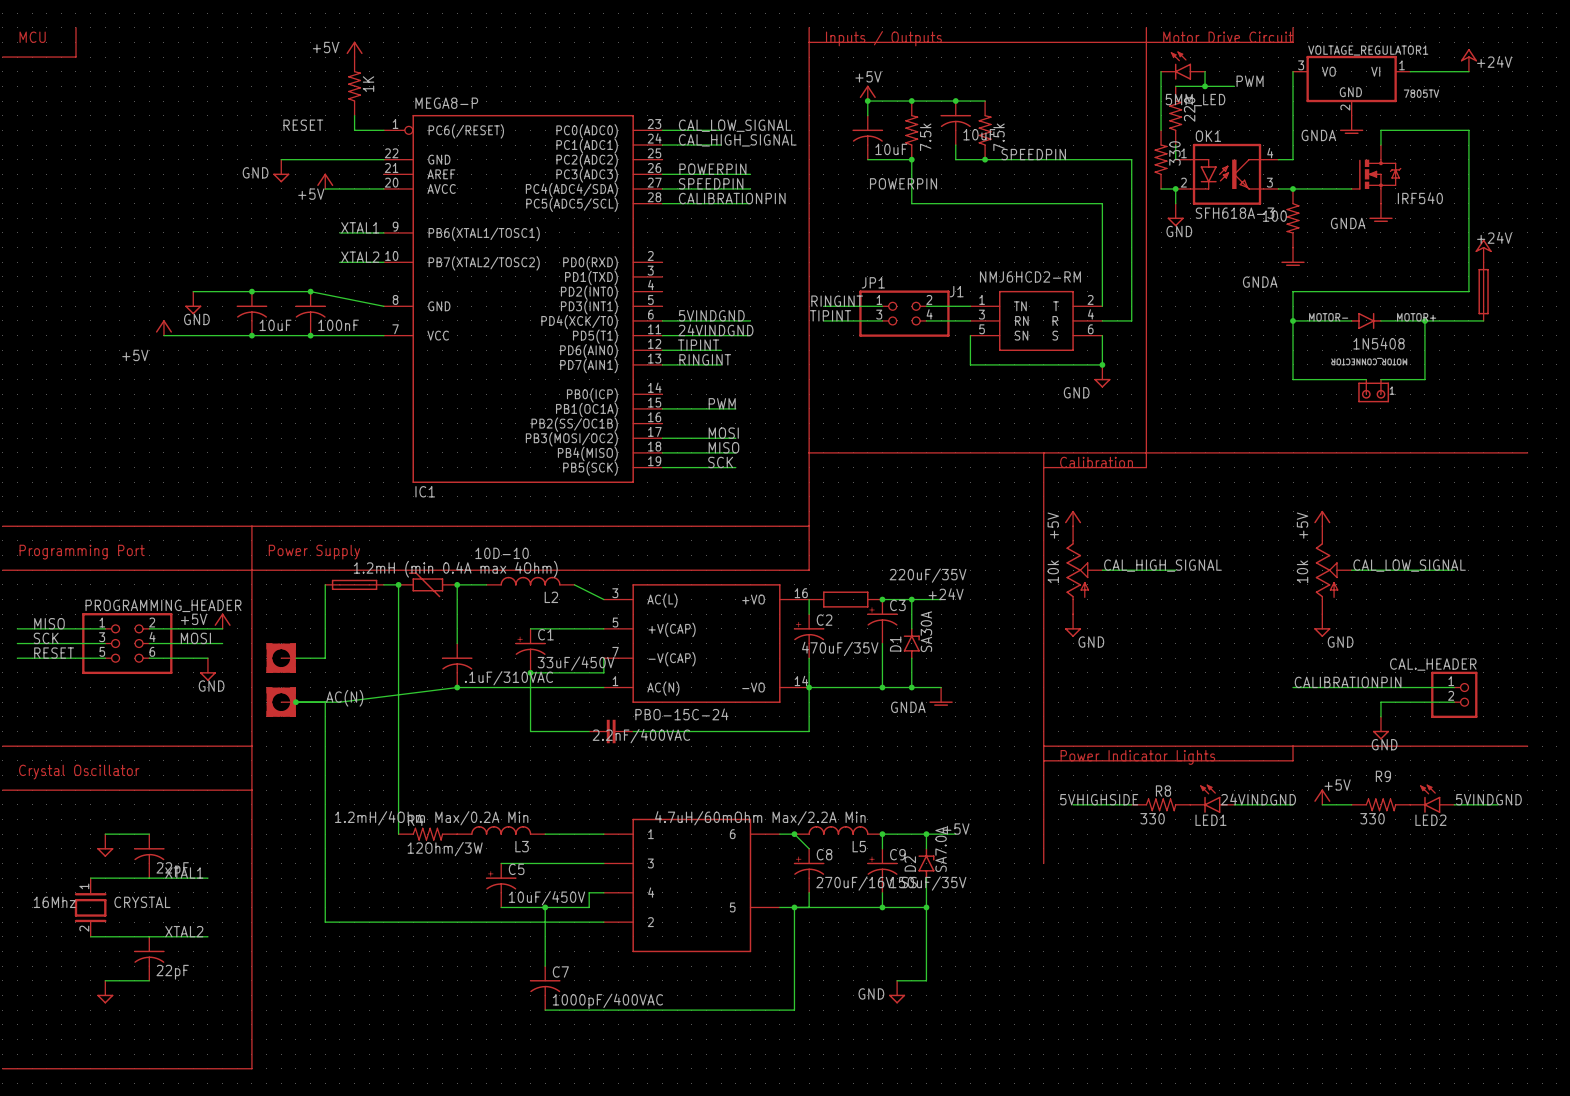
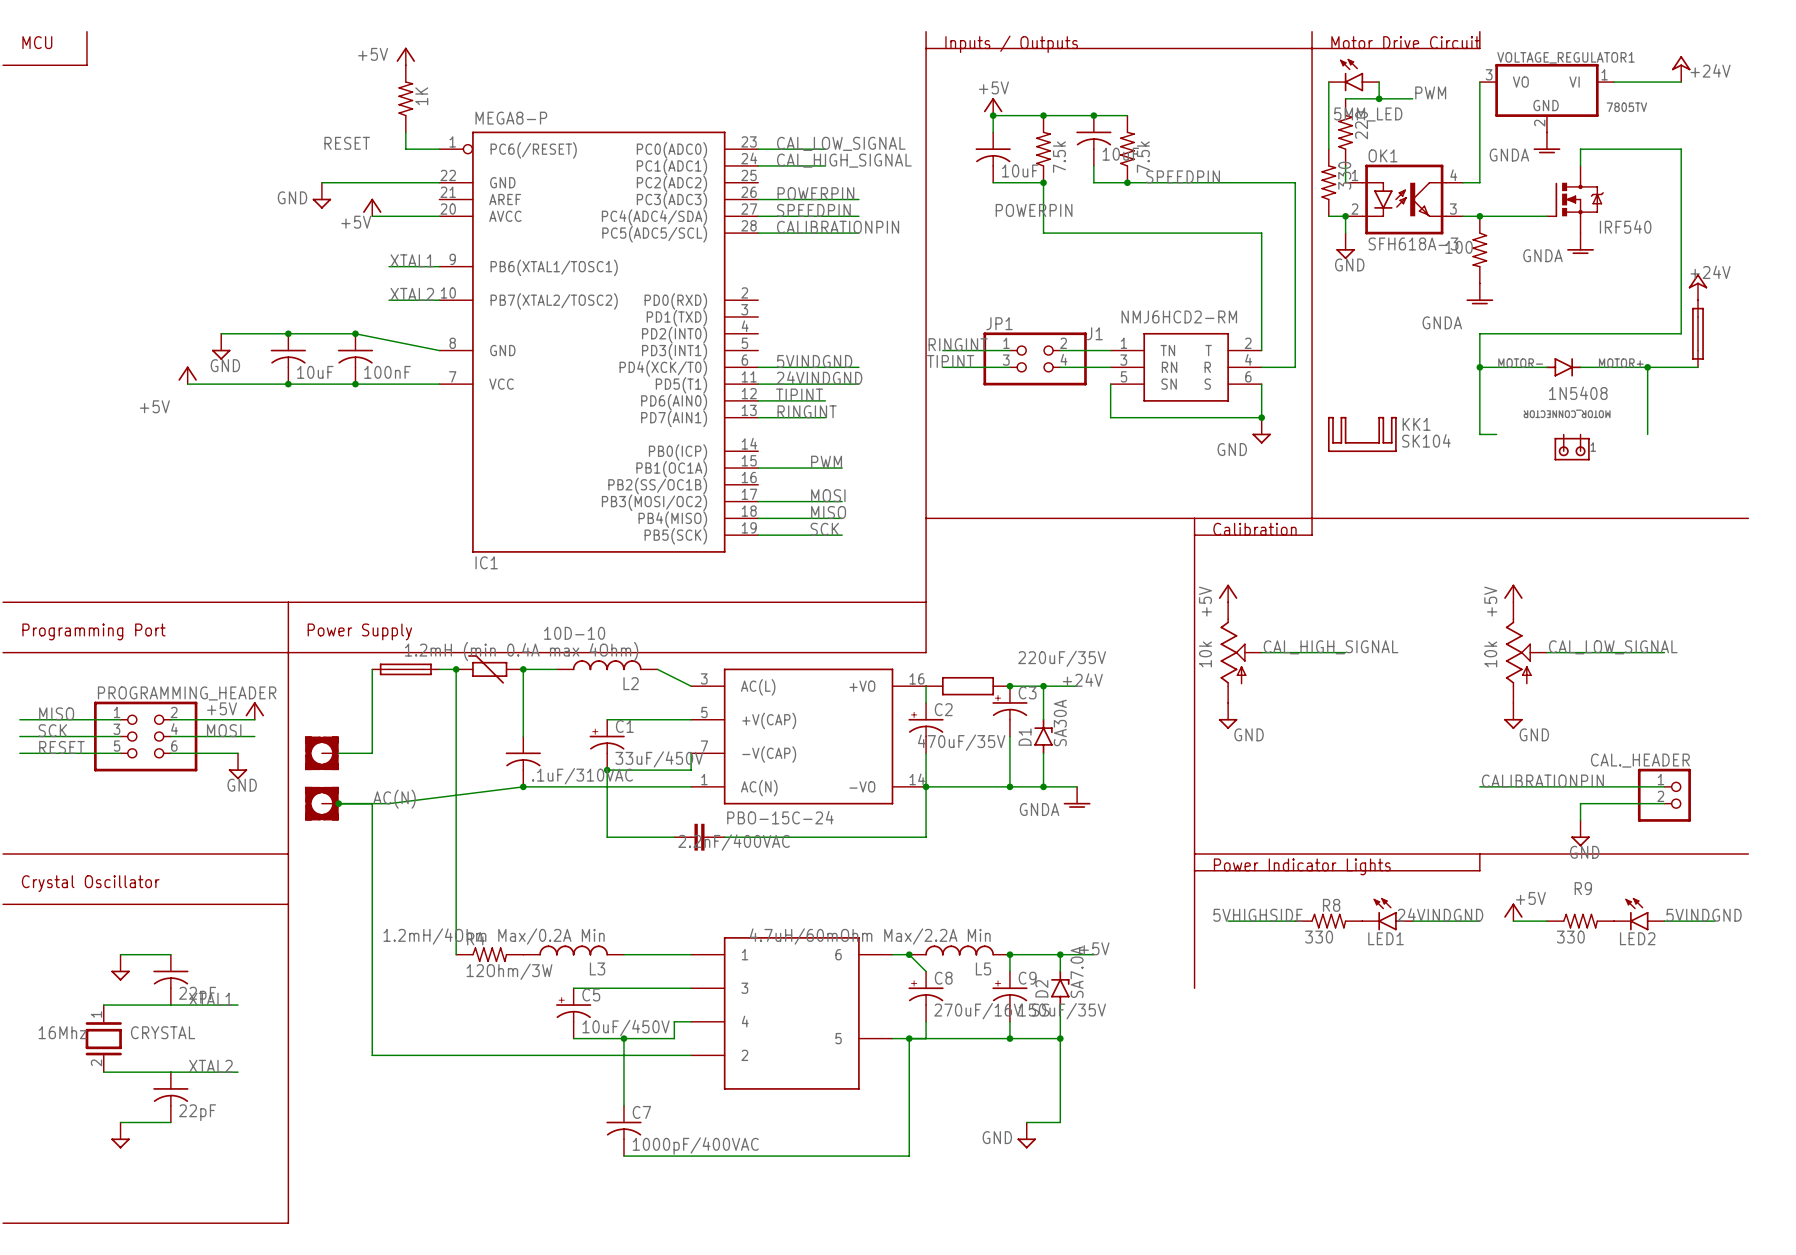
wire: (1424, 320) (1424, 379) (1380, 379) -> none
junction position: (1424, 320) -> (1647, 367)
wire: none -> (1647, 367) (1647, 434)
KK1: none -> SK104 (1362, 434)
wire: (1307, 379) (1366, 379) -> none

